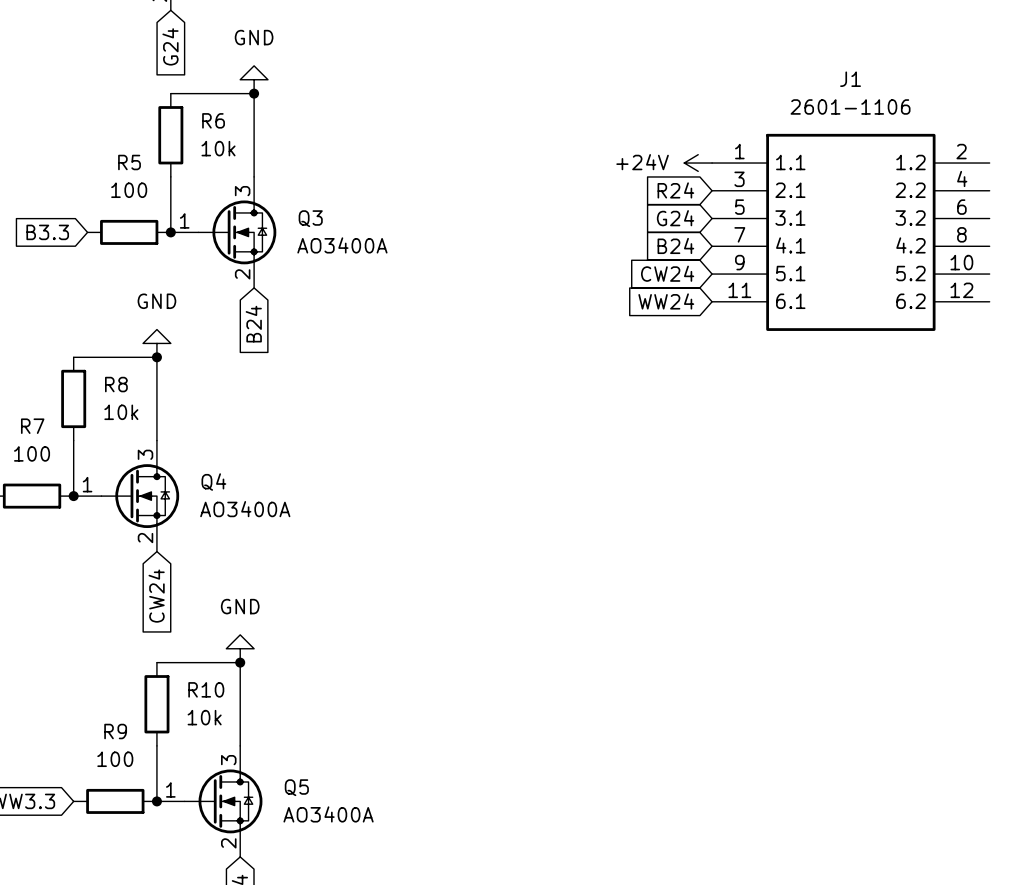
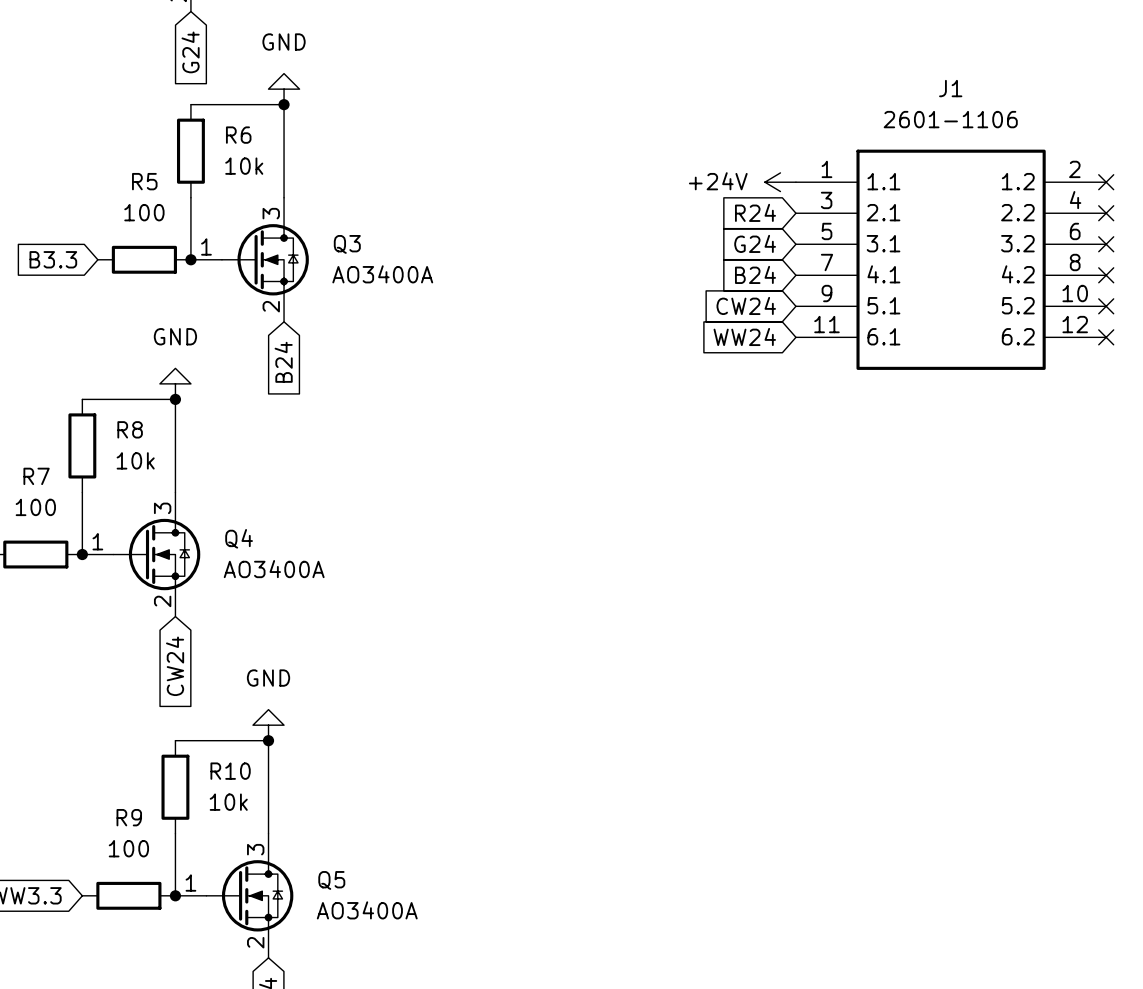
no-connect mark: none -> (1106, 182)
no-connect mark: none -> (1106, 213)
no-connect mark: none -> (1106, 244)
no-connect mark: none -> (1106, 275)
no-connect mark: none -> (1106, 306)
no-connect mark: none -> (1106, 337)

